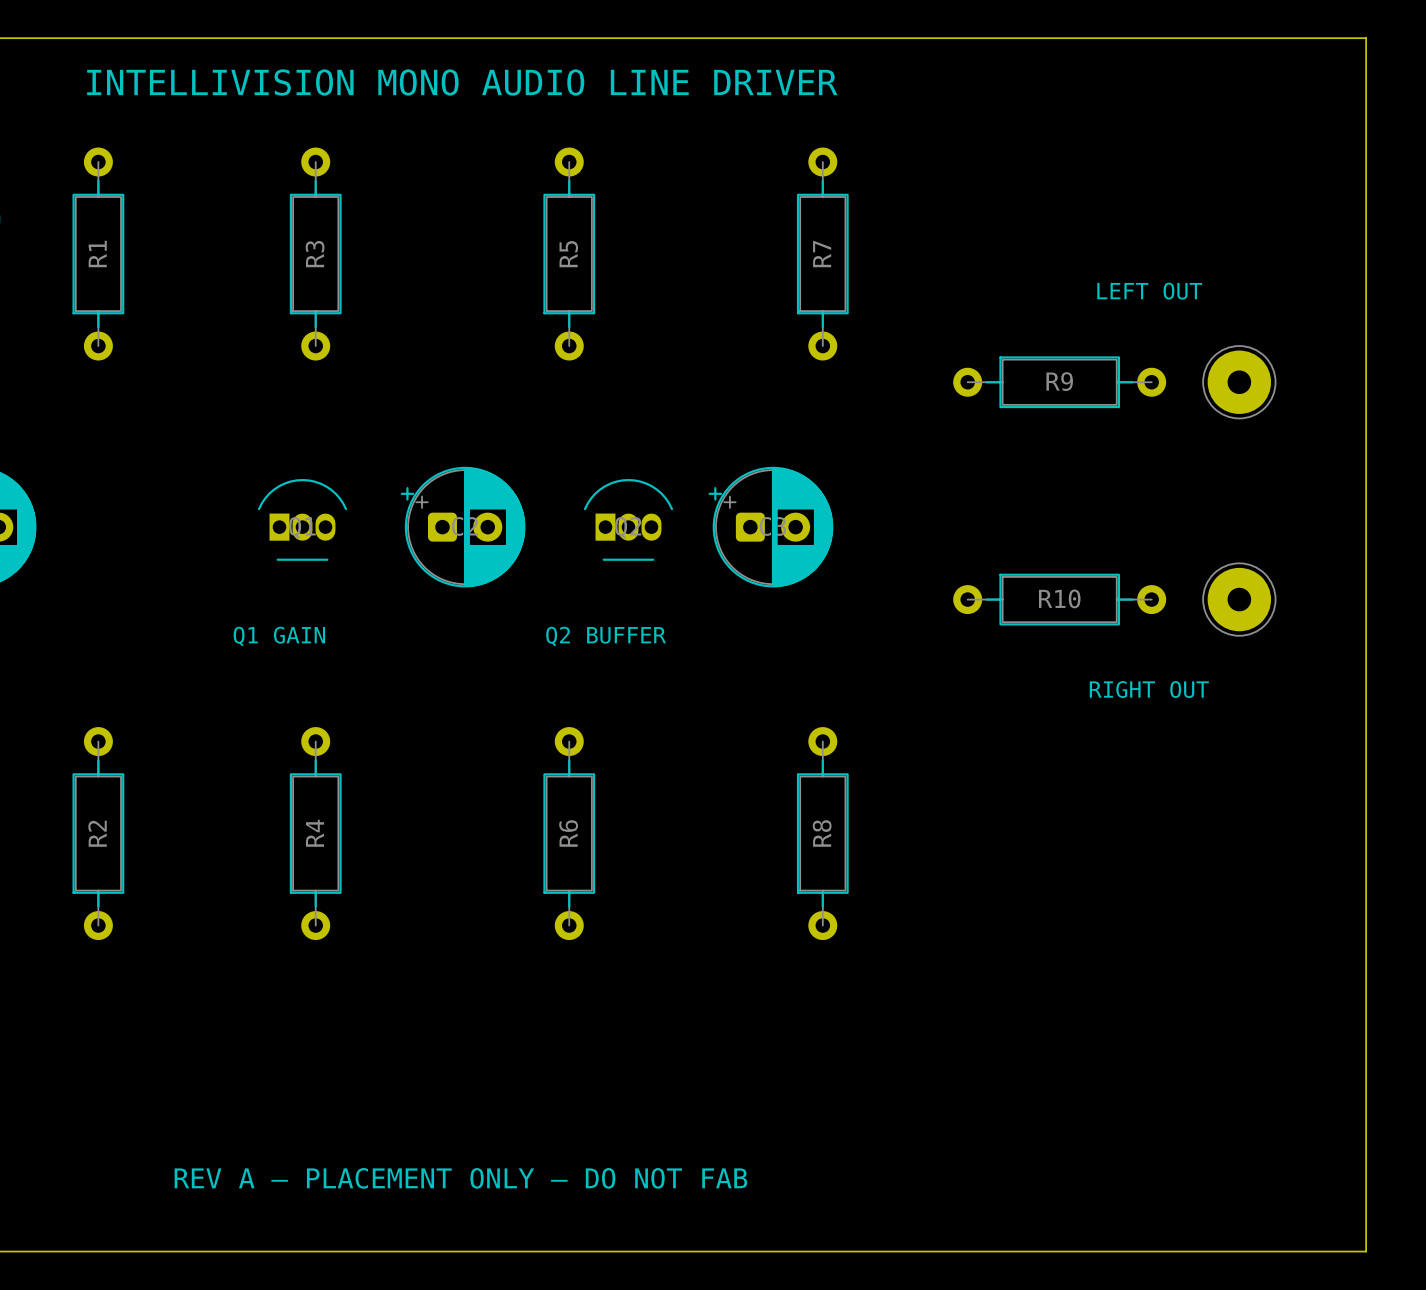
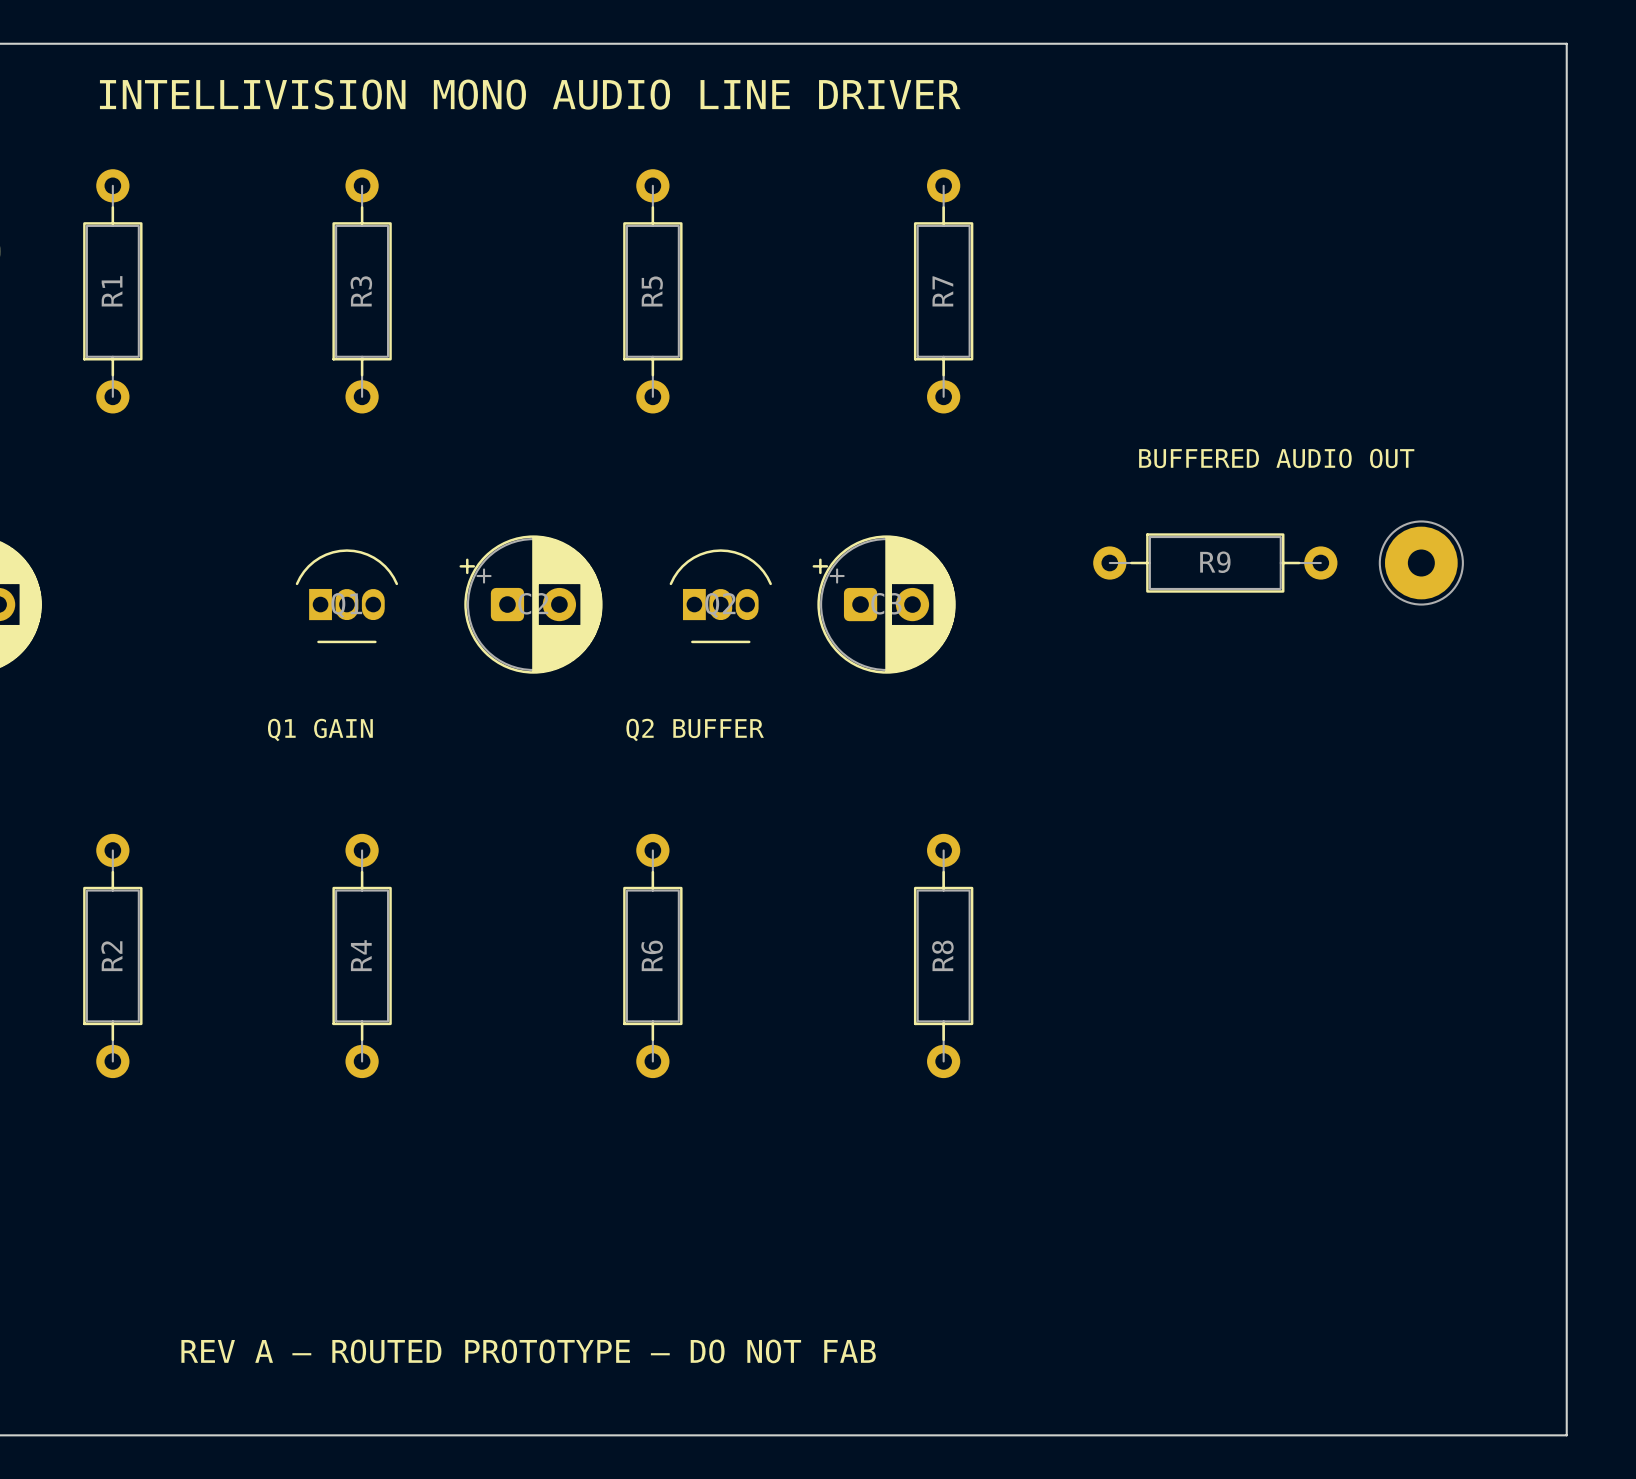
text: LEFT OUT (1149, 291) -> none
R9 position: (1059, 382) -> (1215, 563)
part: (1239, 382) -> none
text: none -> BUFFERED AUDIO OUT (1276, 458)
part: none -> (1421, 563)
R10: (1059, 599) -> none
part: (1239, 599) -> none
text: RIGHT OUT (1149, 689) -> none
text: REV A — PLACEMENT ONLY — DO NOT FAB (460, 1178) -> REV A — ROUTED PROTOTYPE — DO NOT FAB (528, 1351)

